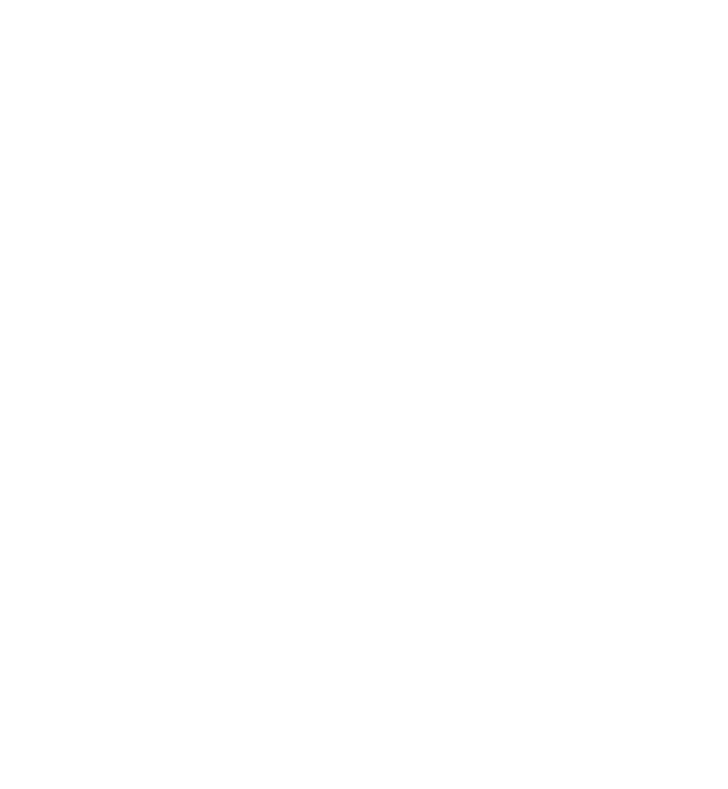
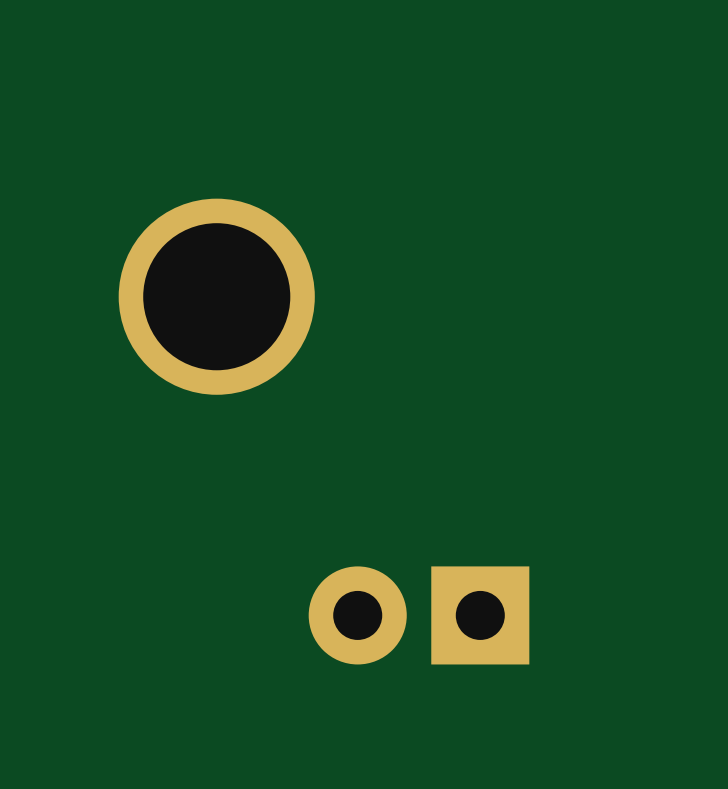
part: none -> (216, 296)
part: none -> (419, 615)

